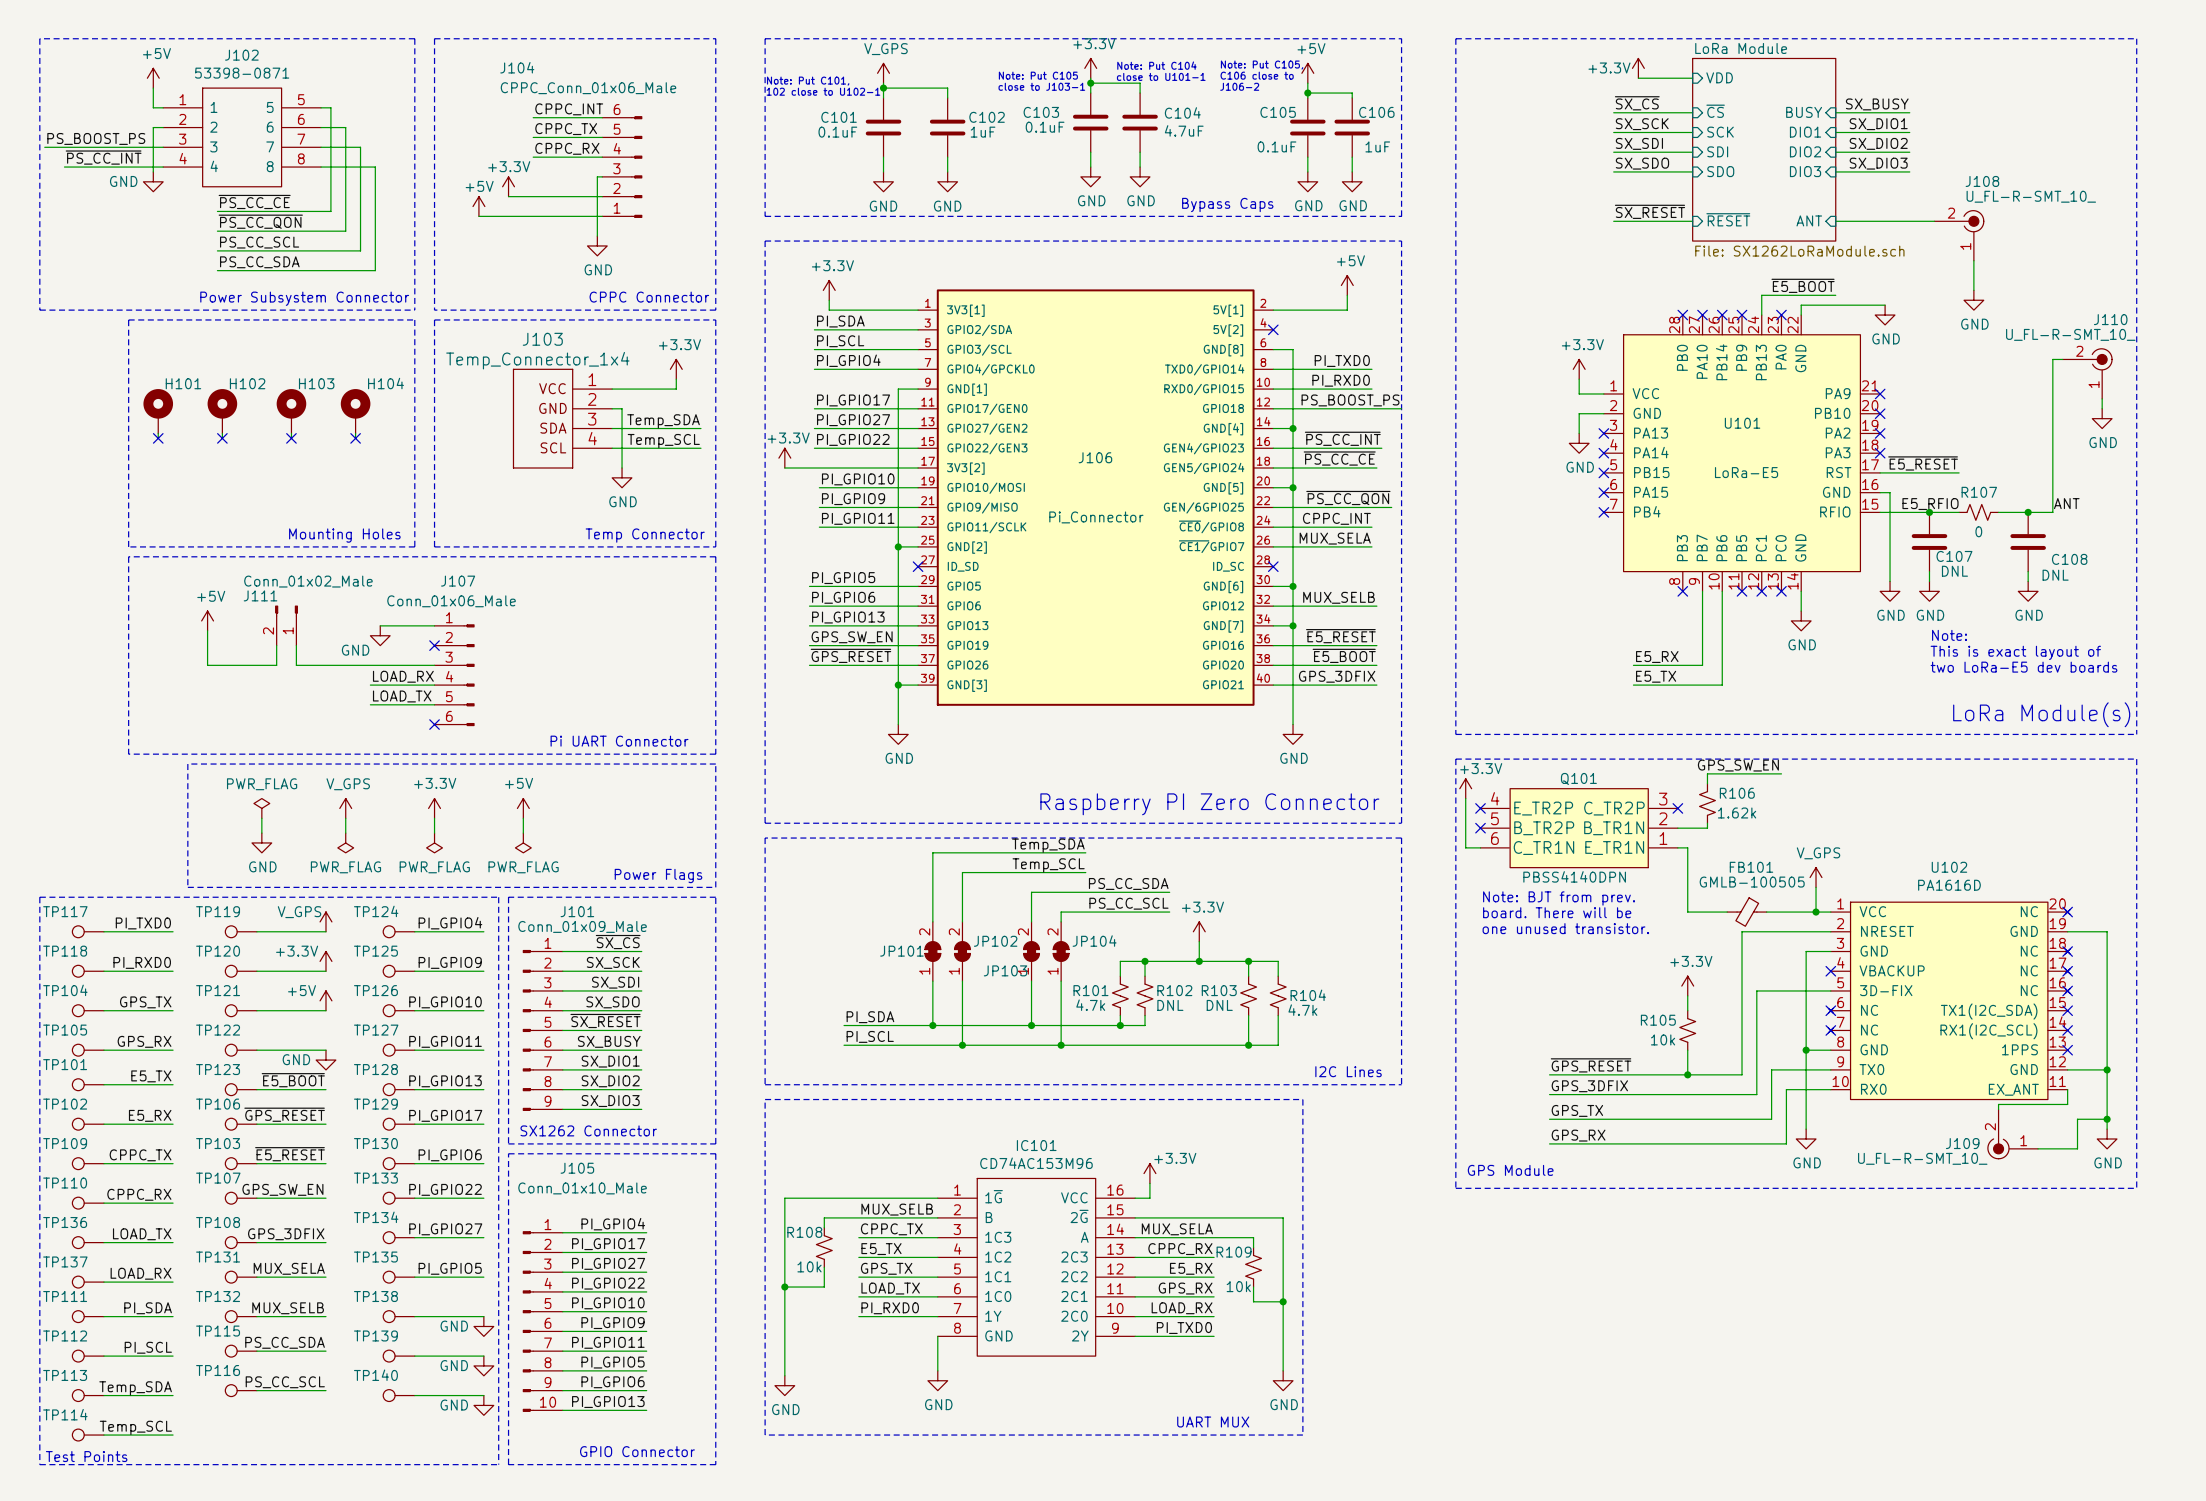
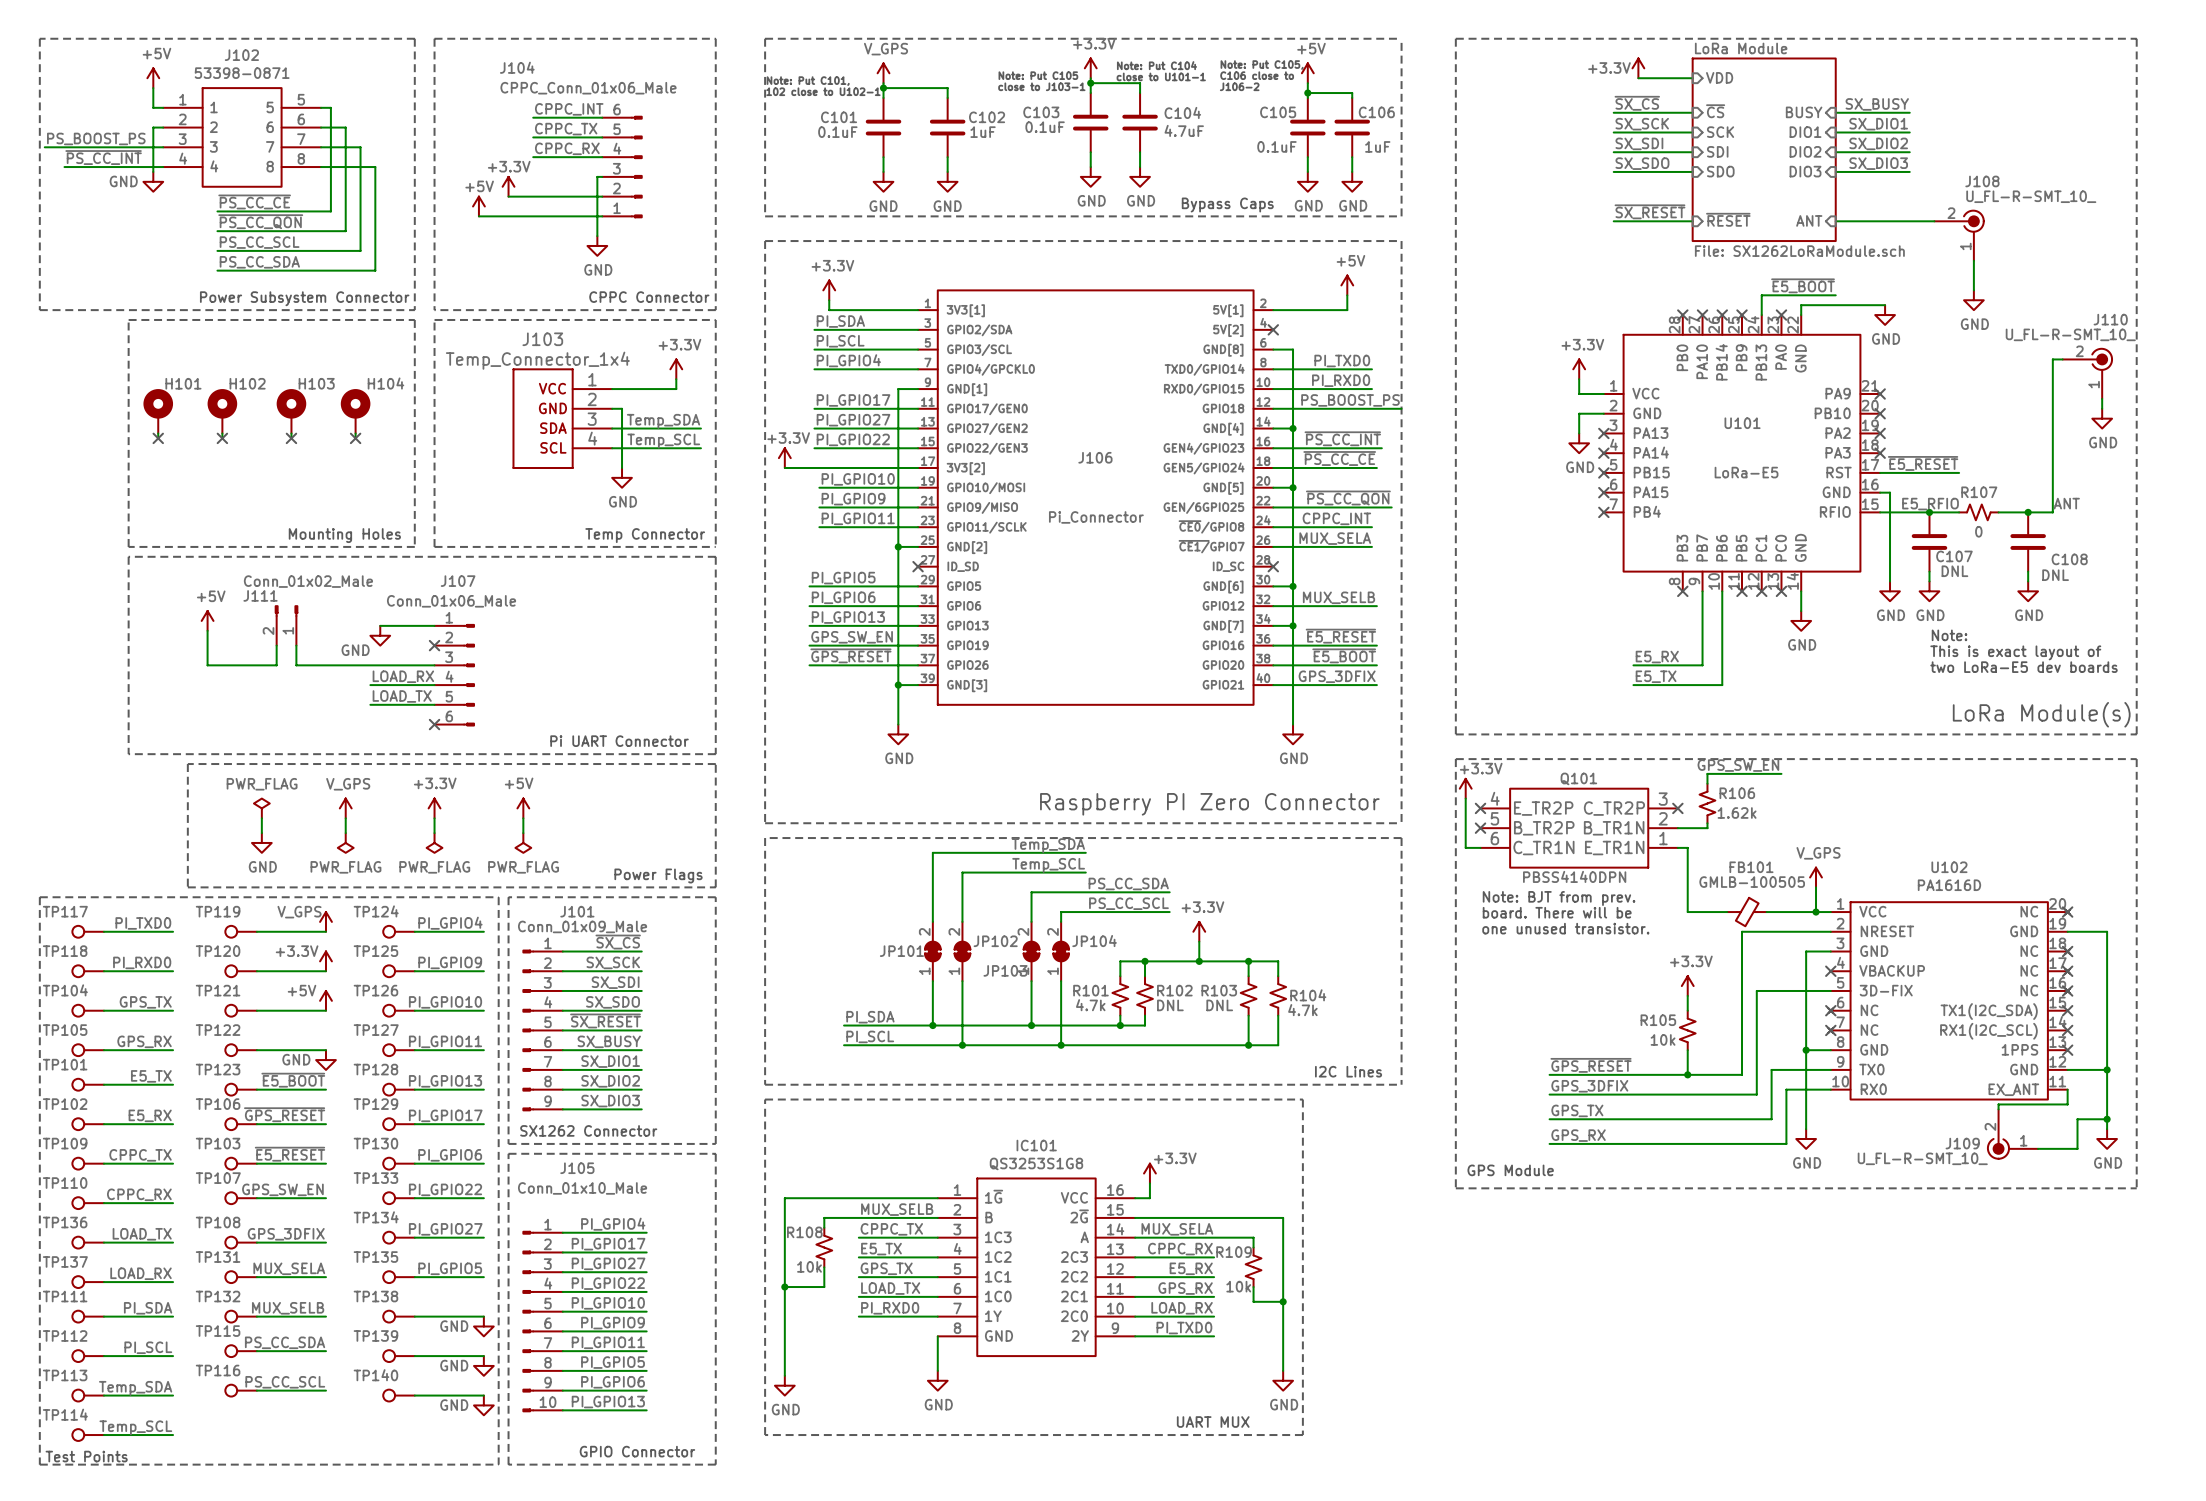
IC101 value: CD74AC153M96 (1036, 1163) -> QS3253S1G8 (1036, 1163)

